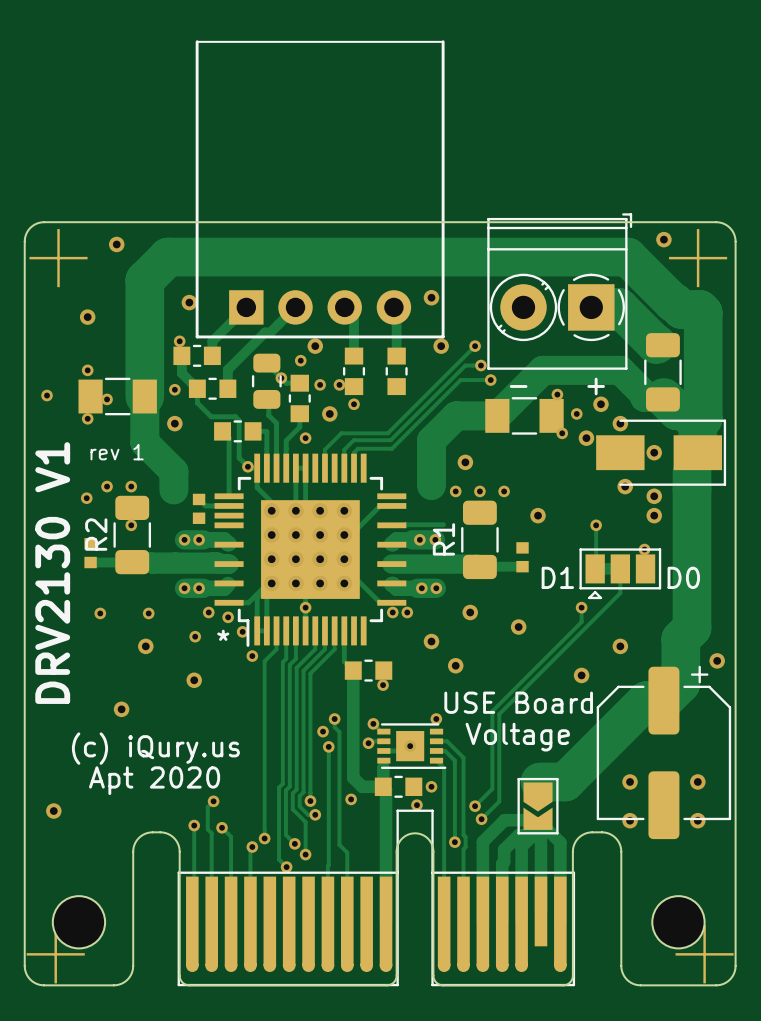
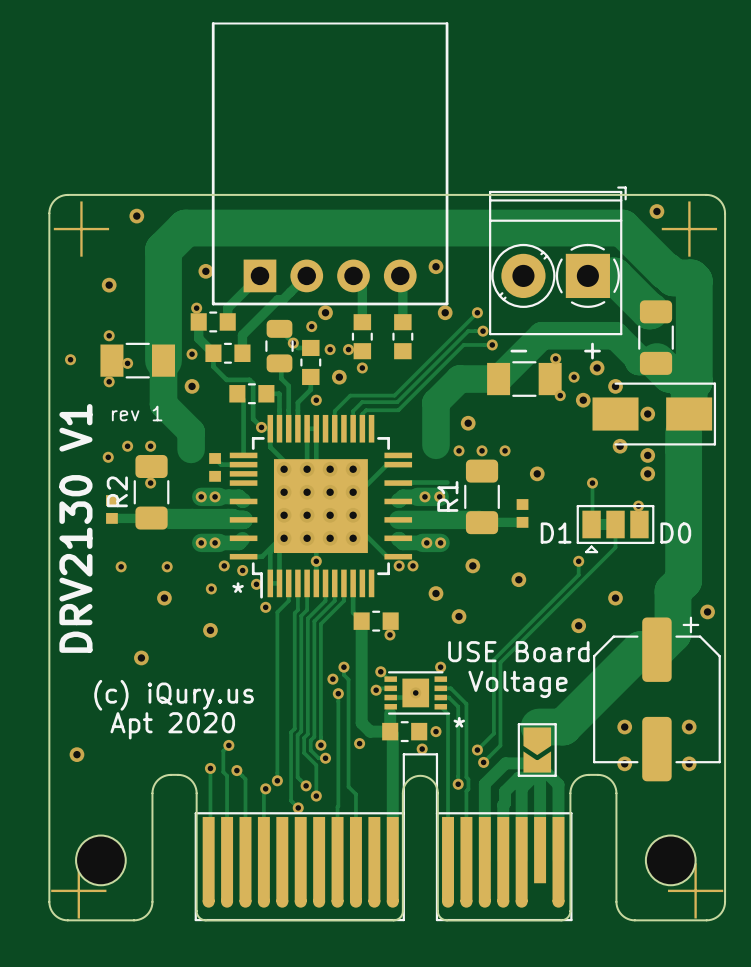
text: none -> * (459, 722)

